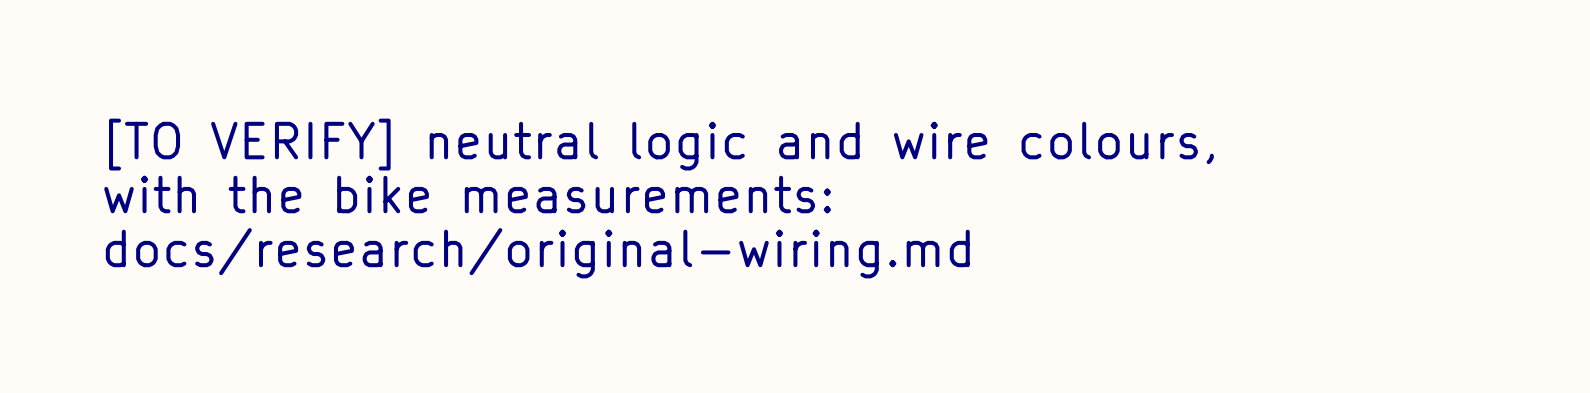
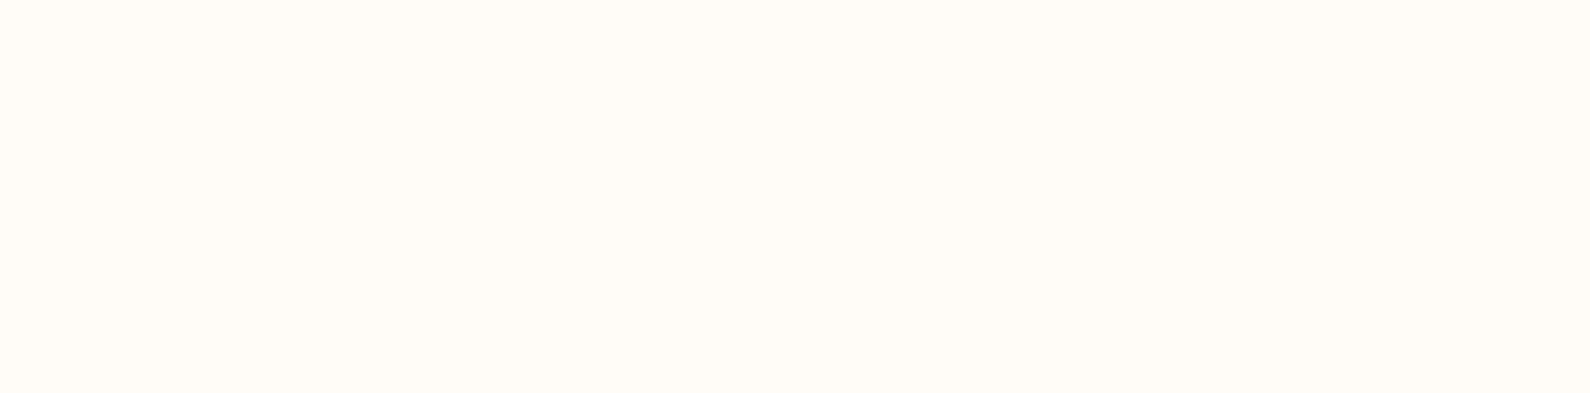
text: [TO VERIFY] neutral logic and wire colours, (661, 144) -> none
text: with the bike measurements: (467, 194) -> none
text: docs/research/original-wiring.md (537, 253) -> none

